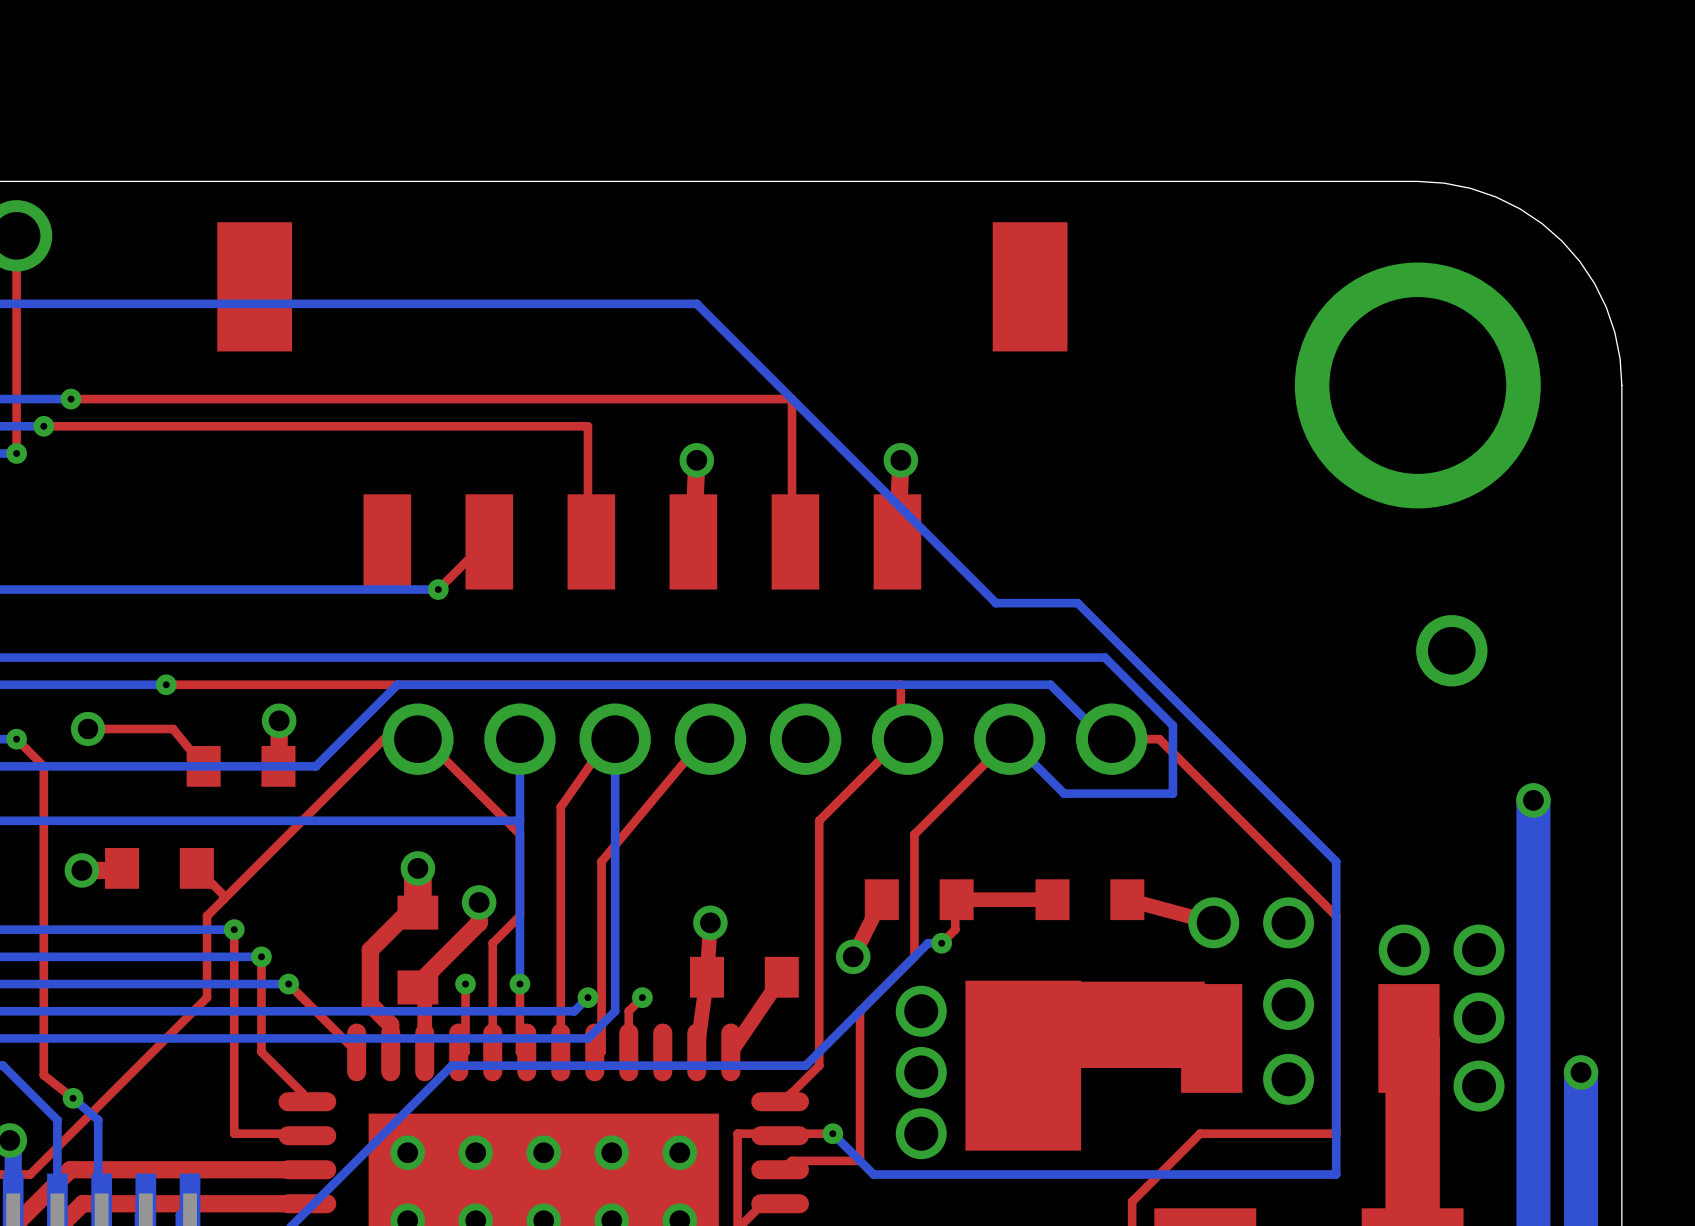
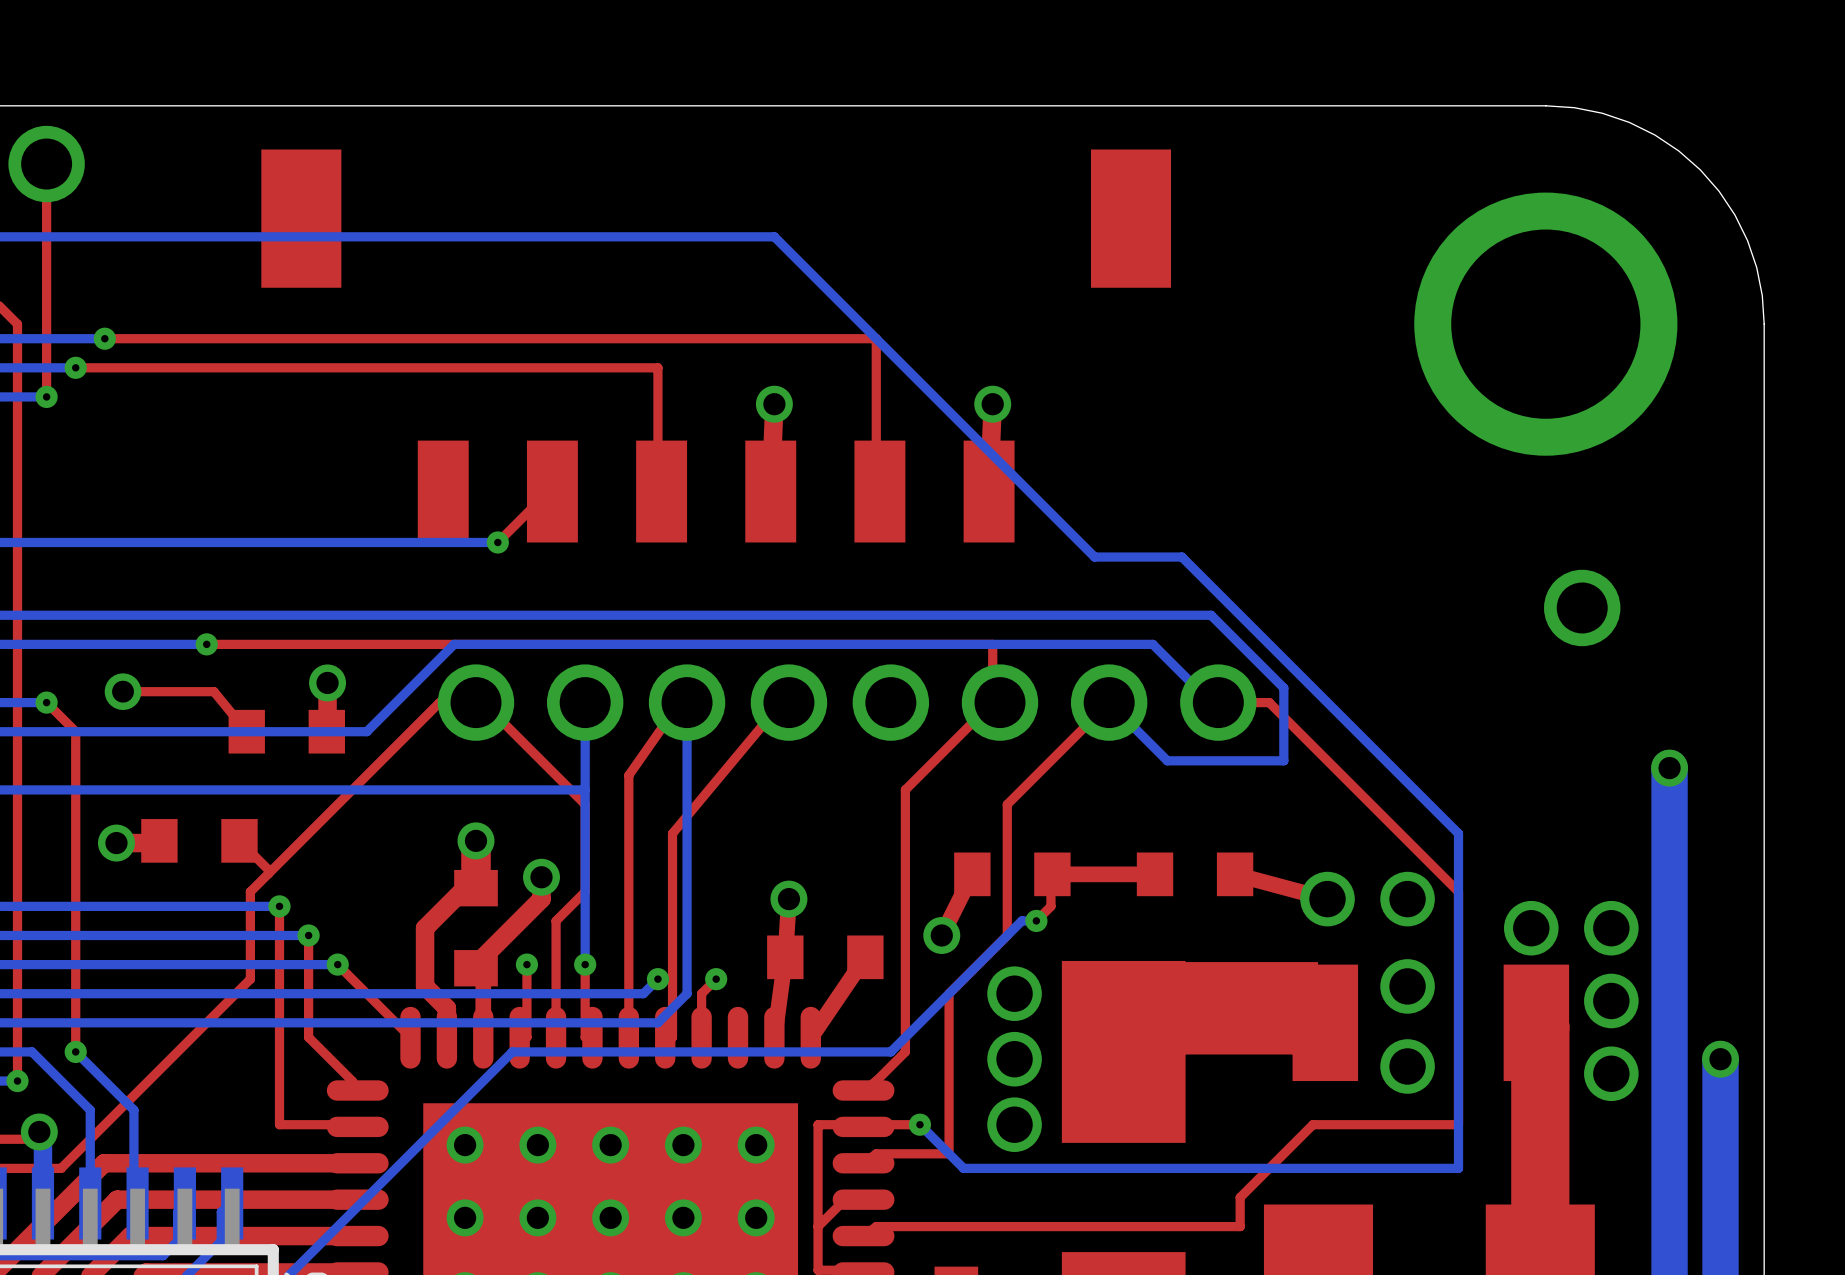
top track: (43, 1065) (43, 1075) (73, 1098) -> none
bottom track: (73, 1098) (98, 1120) -> (75, 1051) (133, 1110)
via position: (73, 1098) -> (75, 1051)

